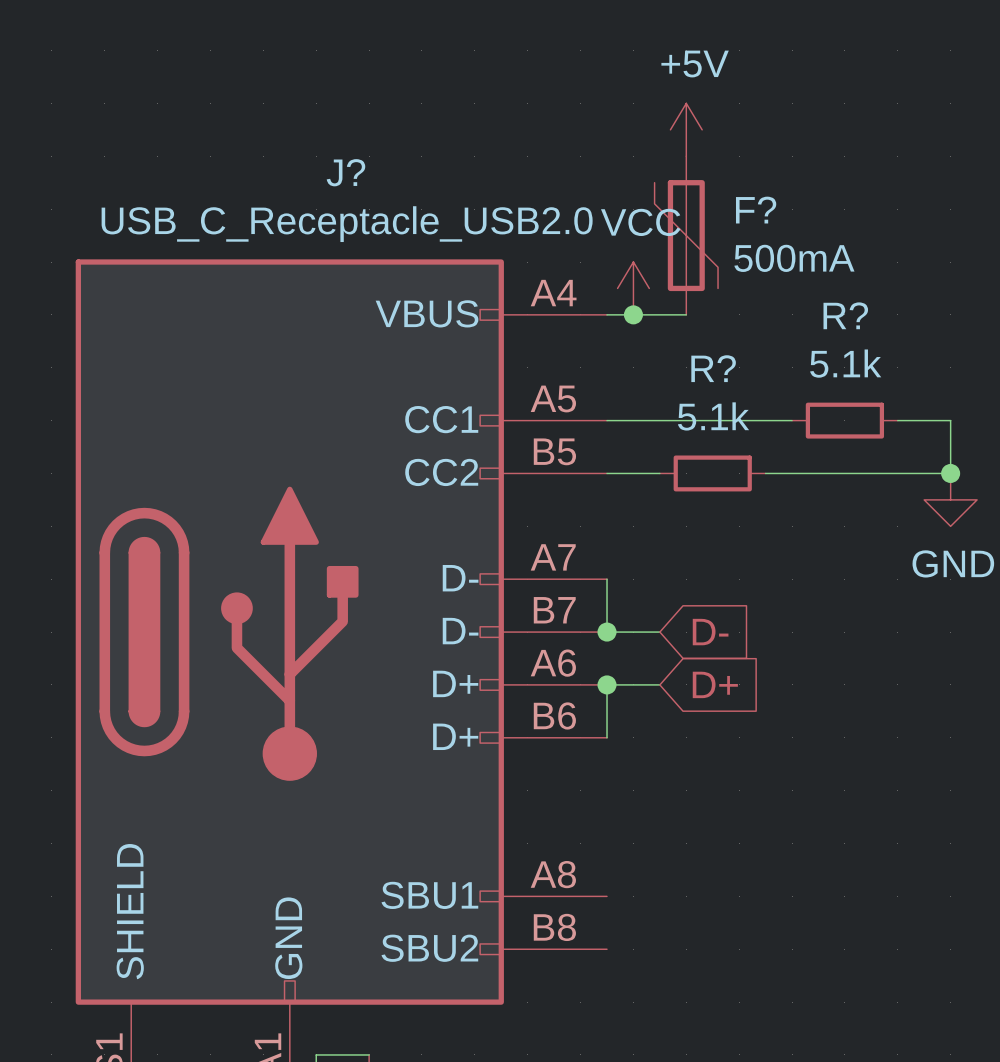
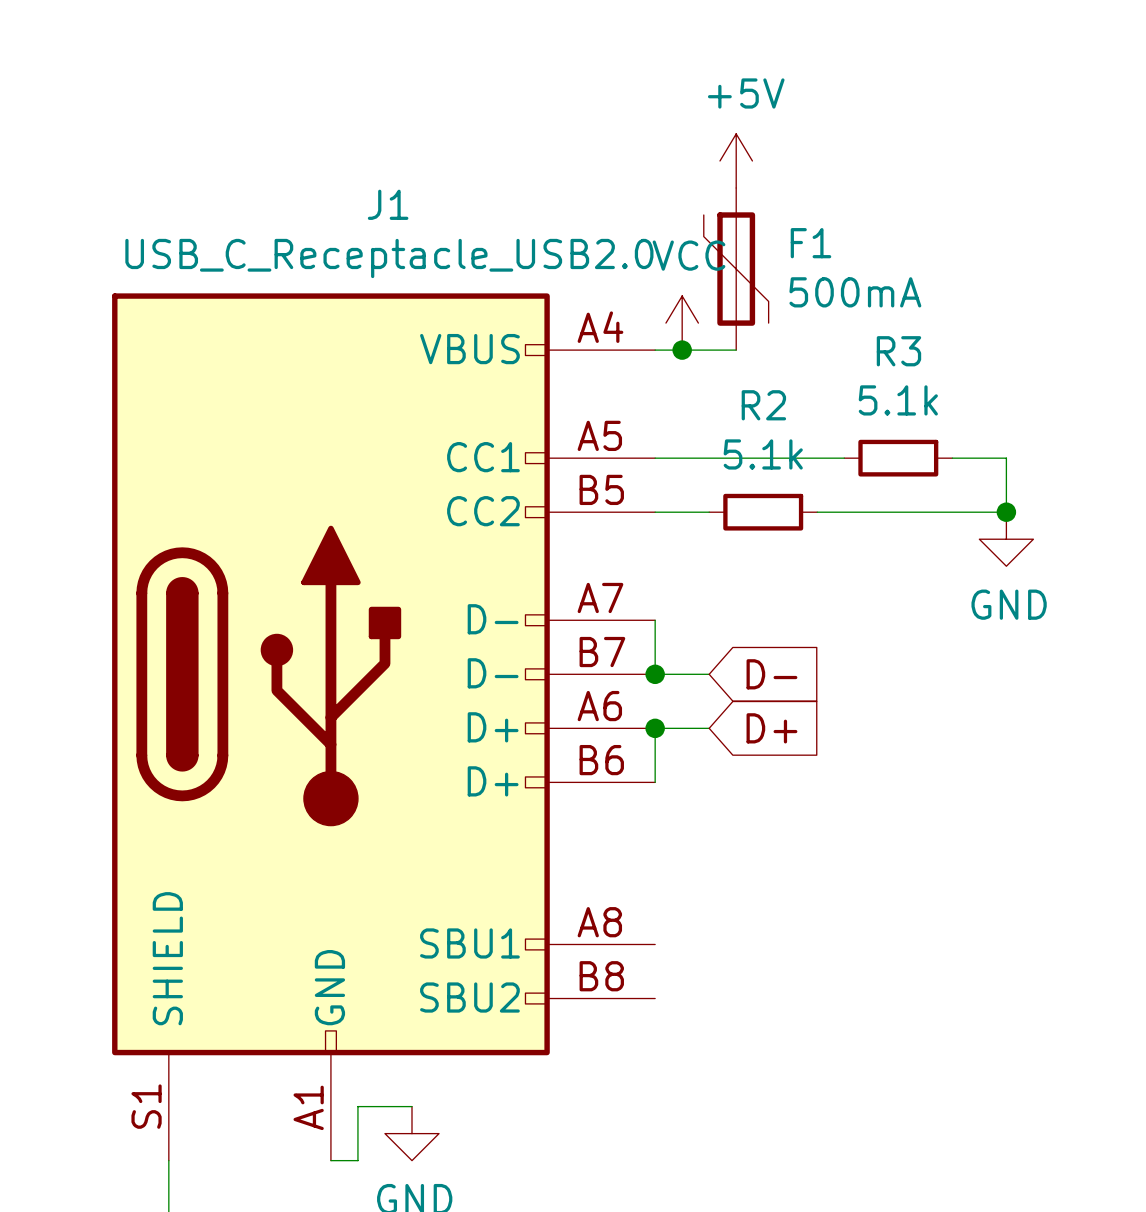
J? name: J? (345, 172) -> J1 (388, 204)
F? name: F? (756, 210) -> F1 (810, 243)
R? name: R? (845, 315) -> R3 (898, 351)
R? name: R? (713, 368) -> R2 (763, 405)

